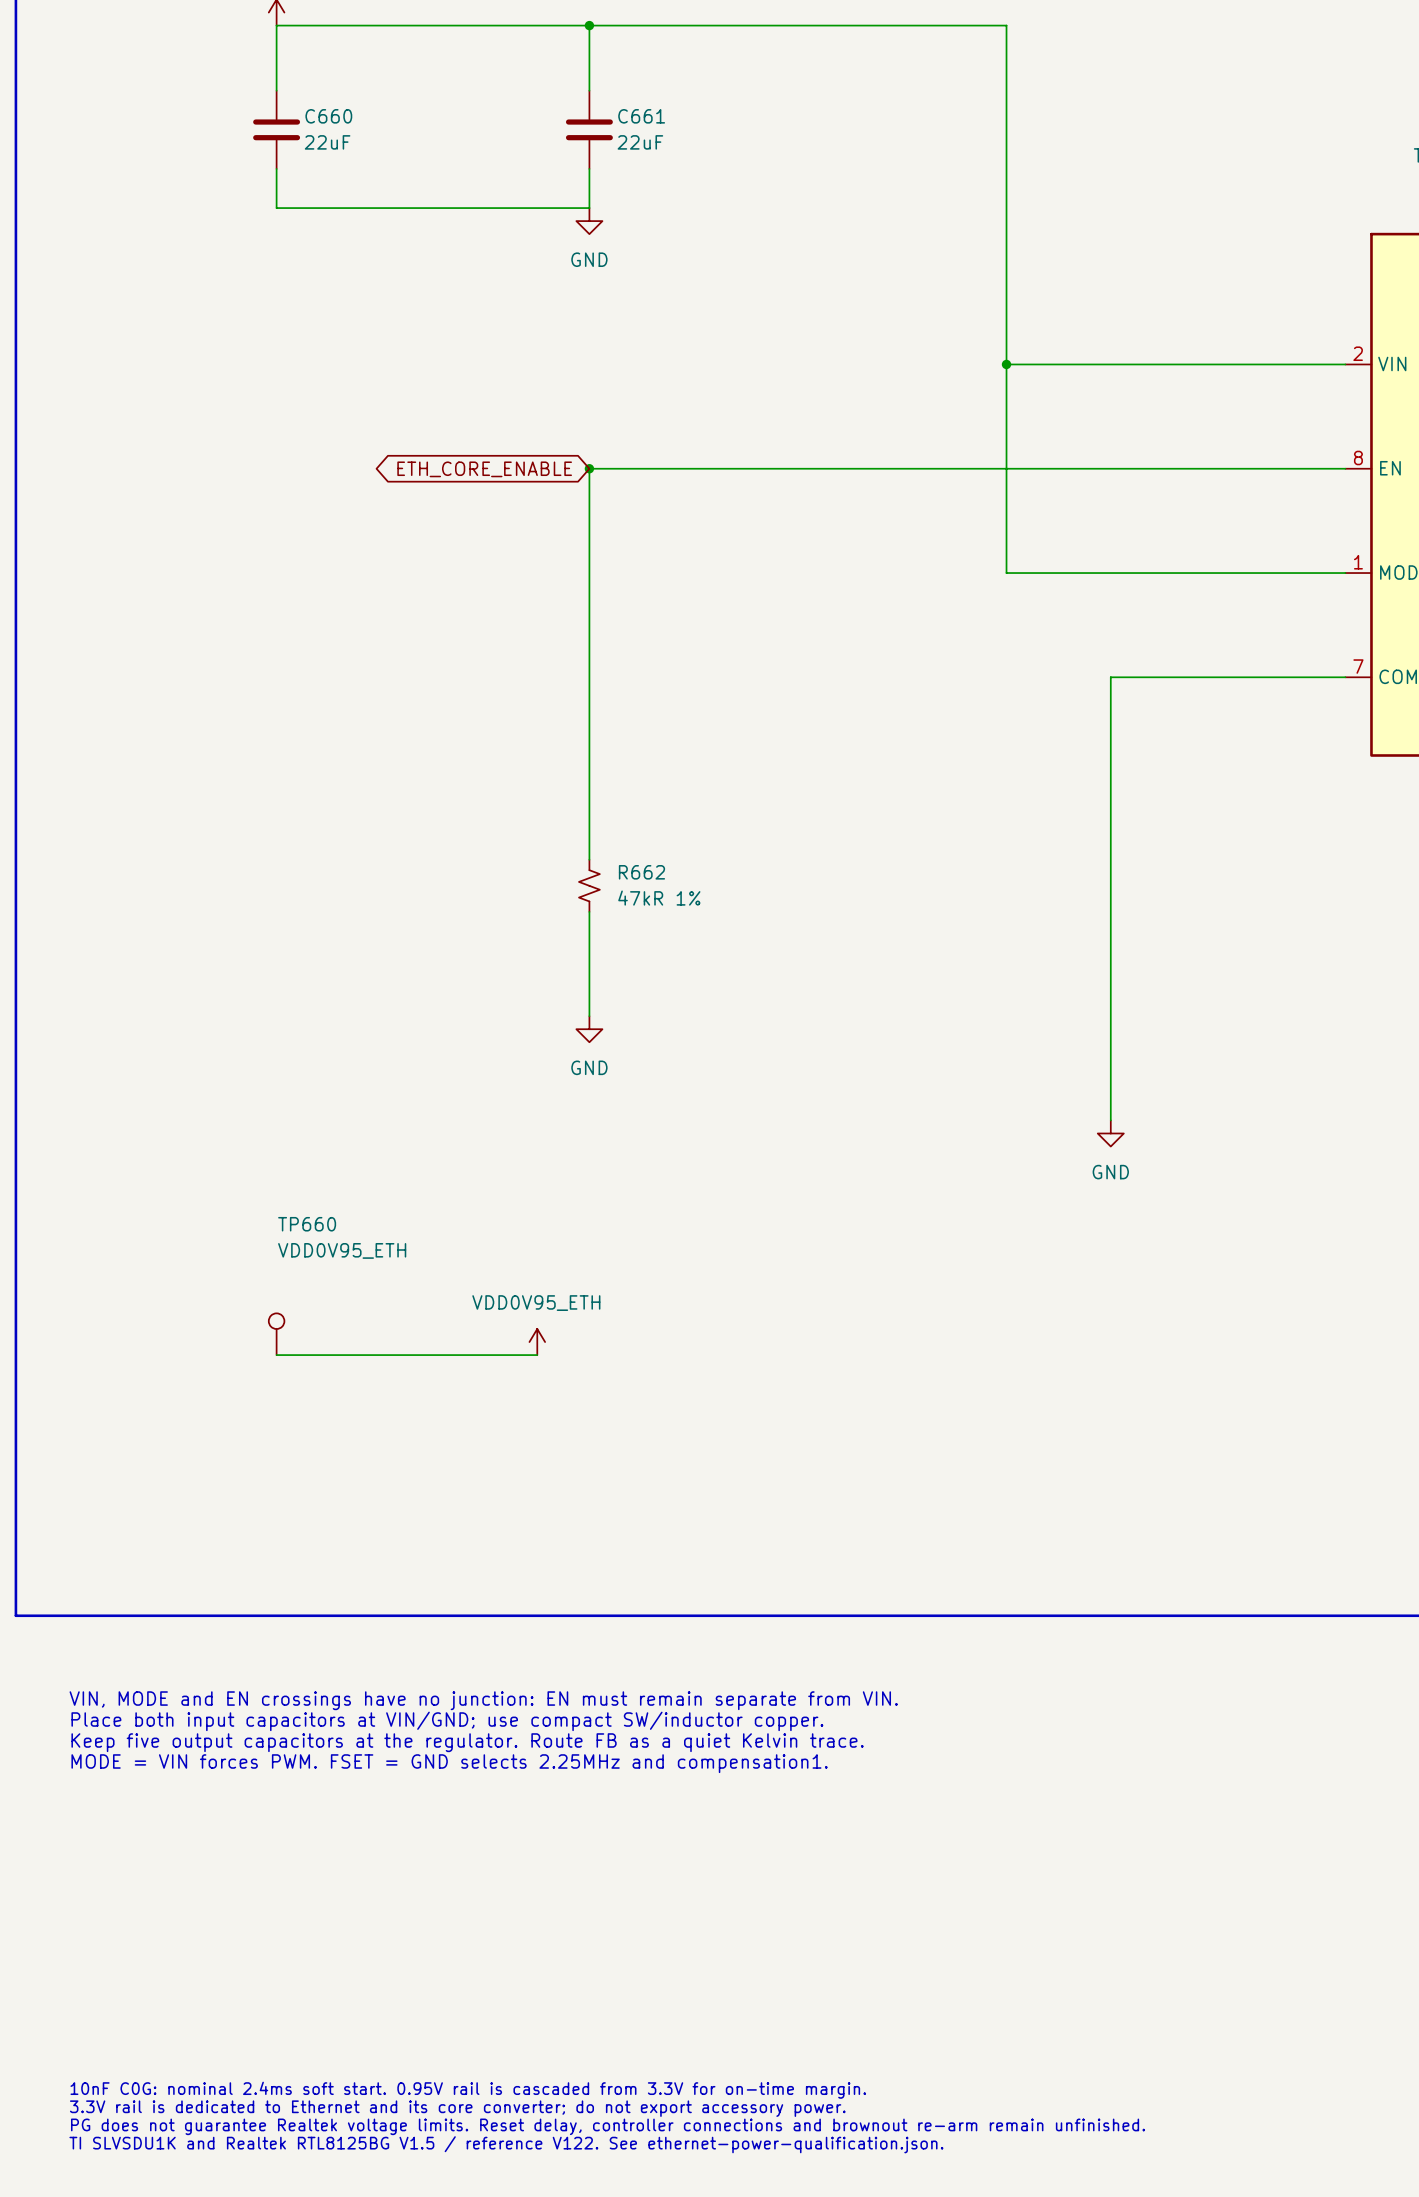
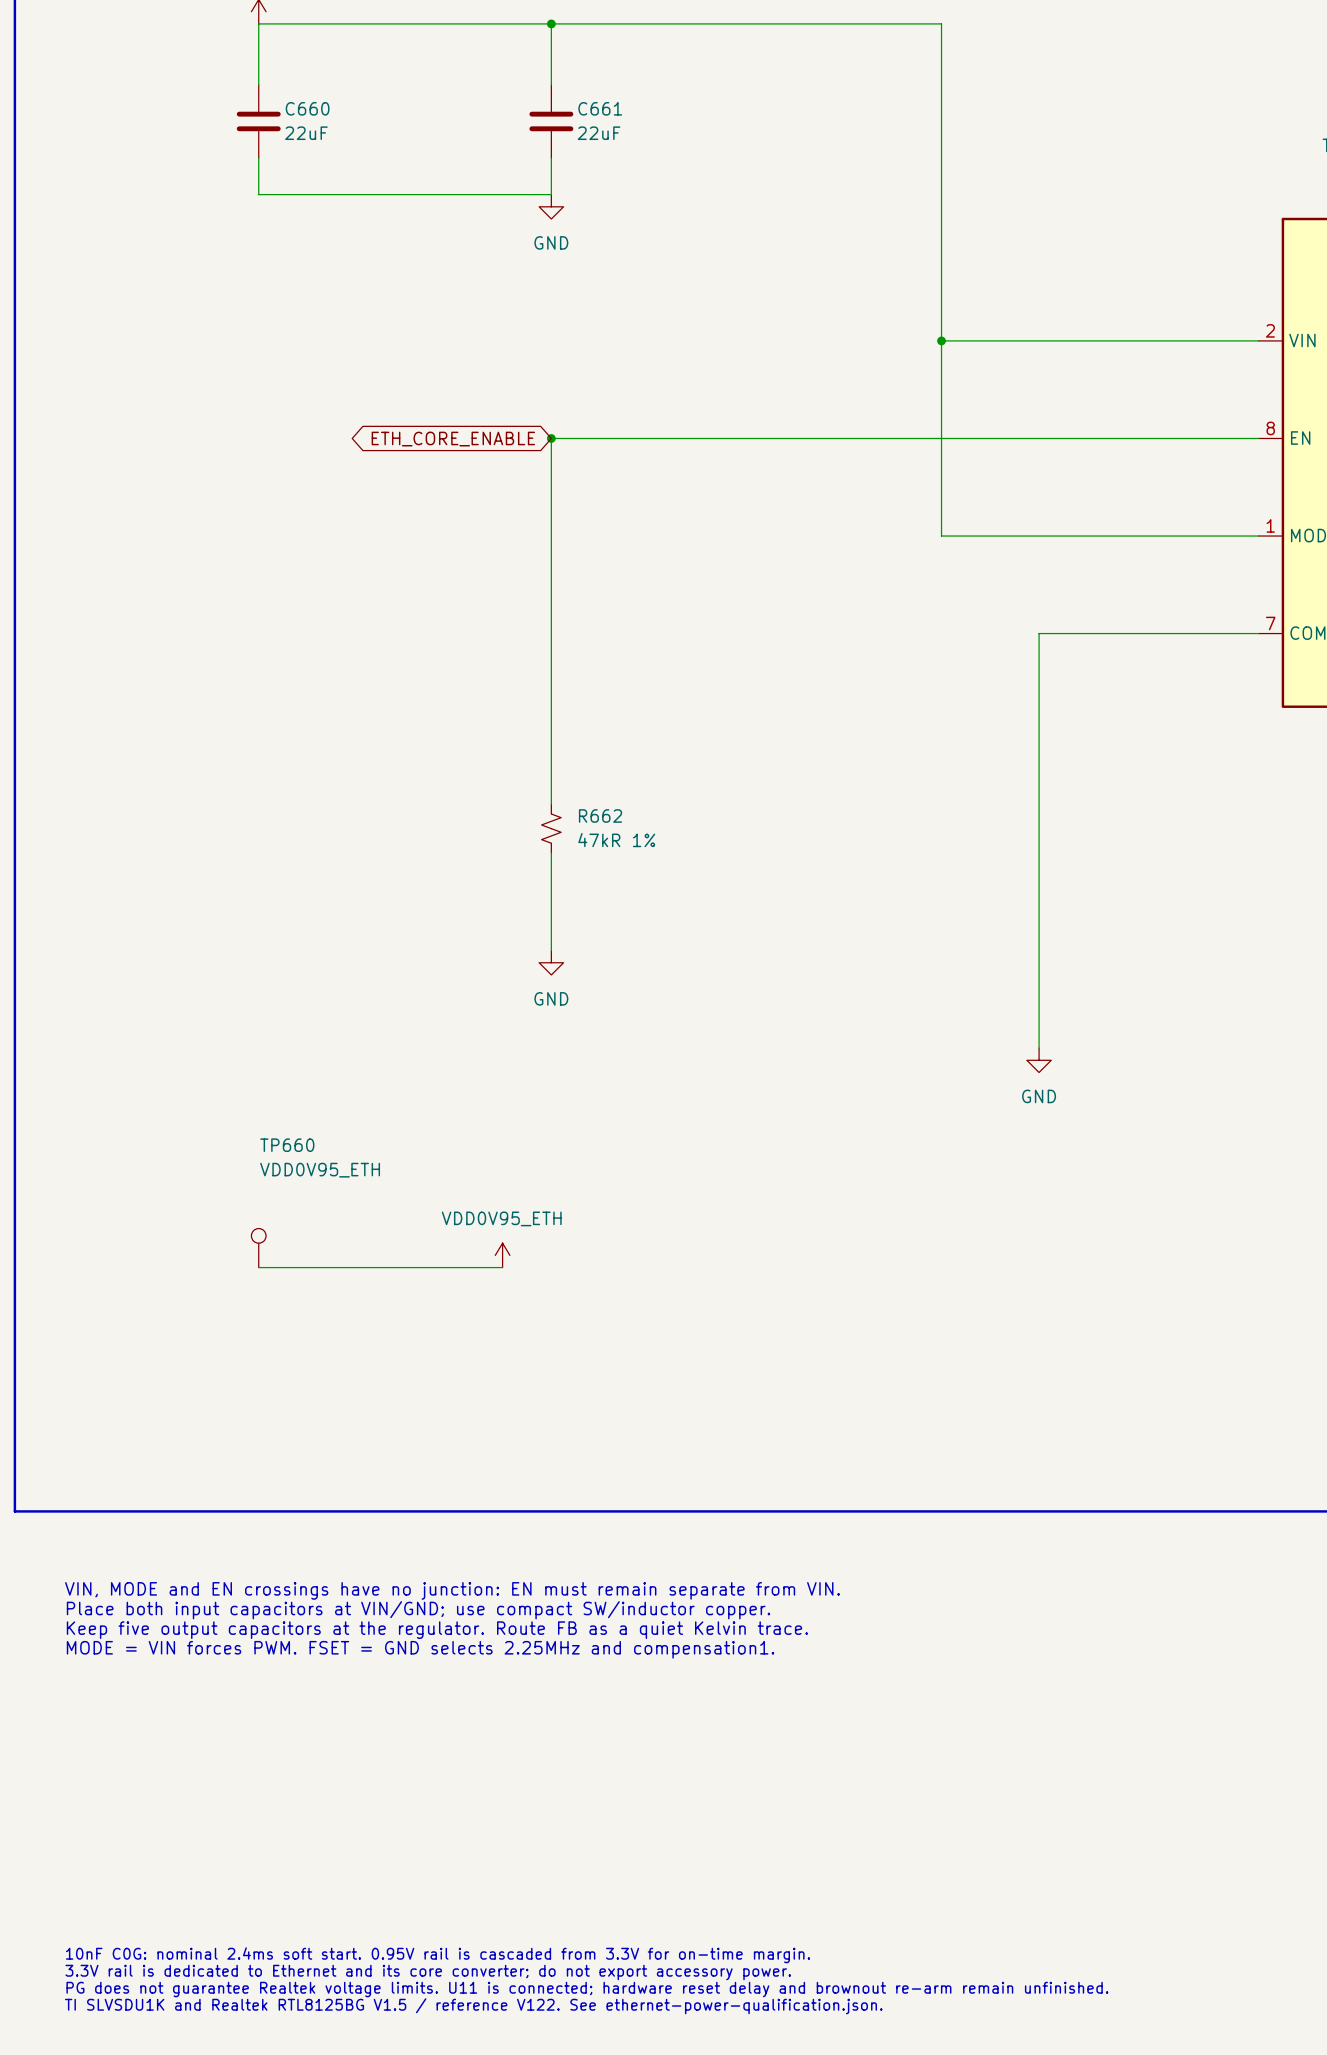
text: PG does not guarantee Realtek voltage limits. Reset delay, controller connections and brownout re-arm remain unfinished. (608, 2126) -> PG does not guarantee Realtek voltage limits. U11 is connected; hardware reset delay and brownout re-arm remain unfinished. (587, 1989)

